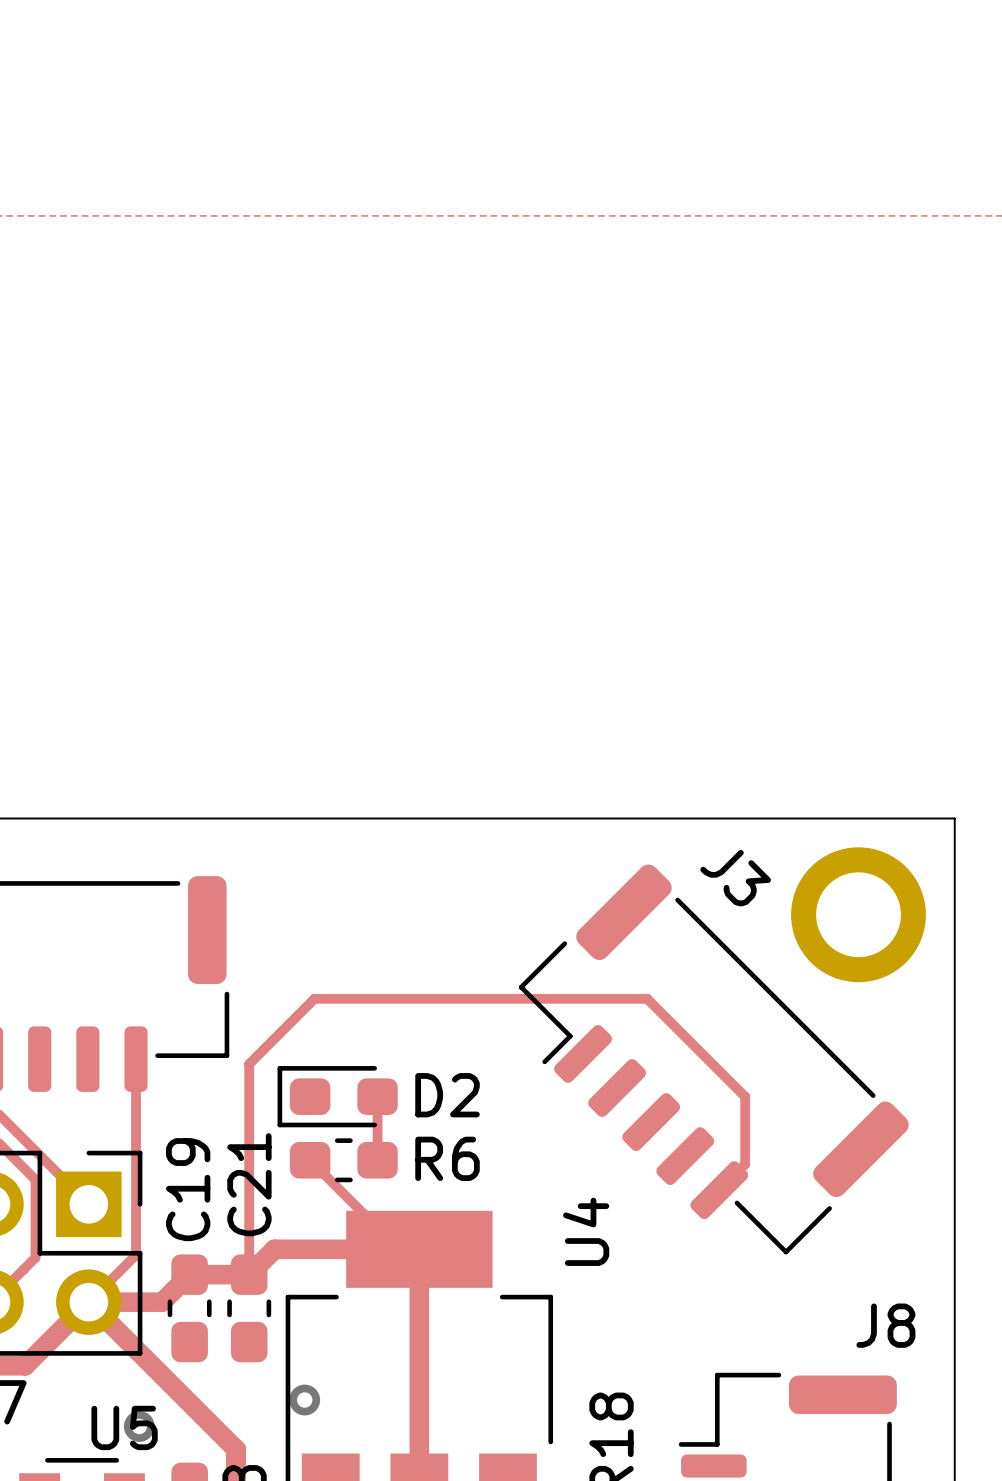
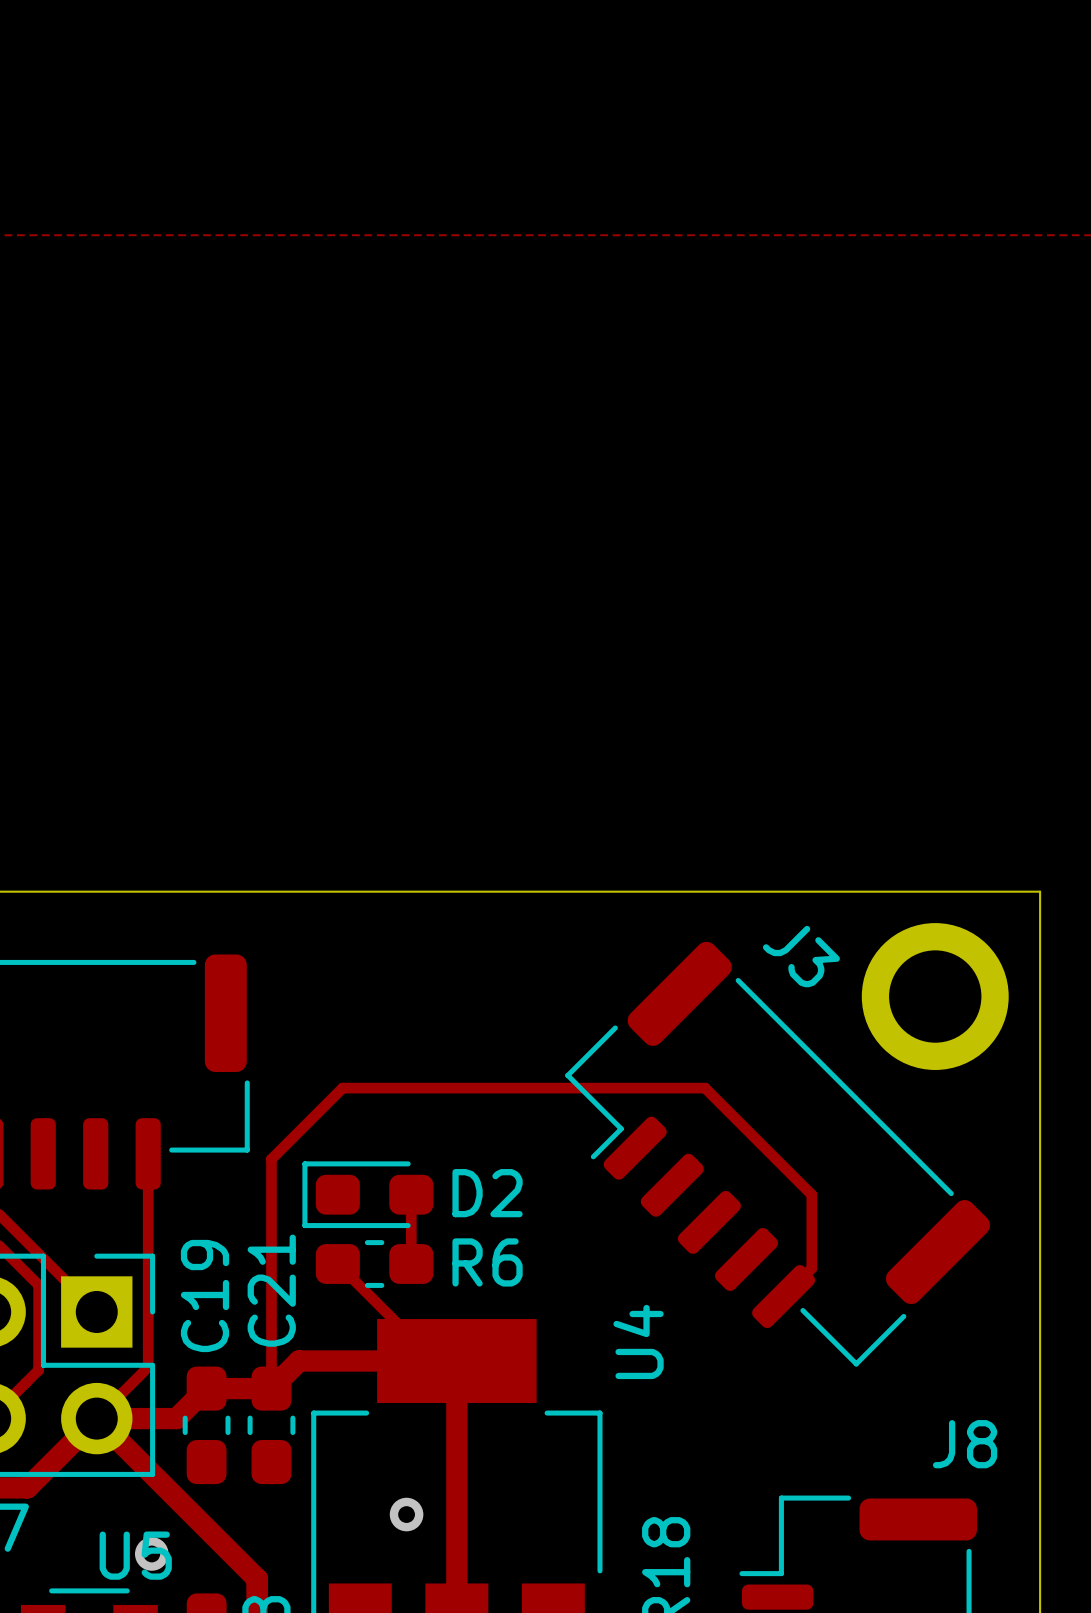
via position: (304, 1400) -> (406, 1514)

